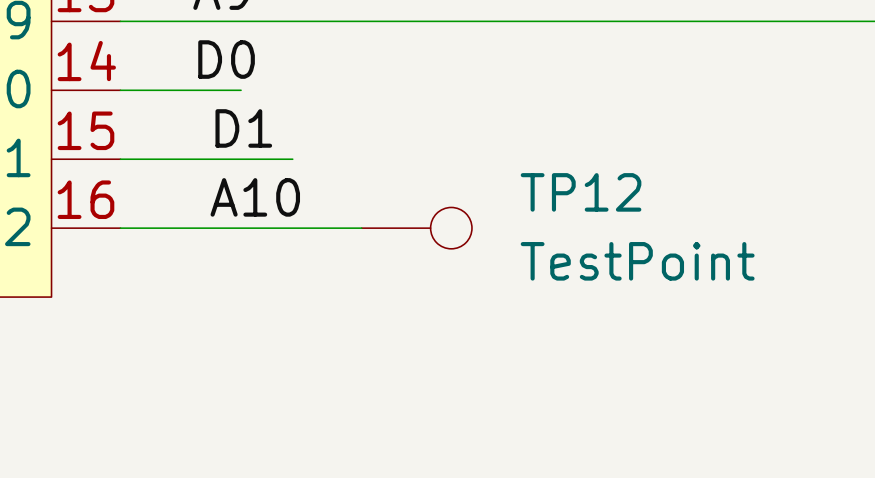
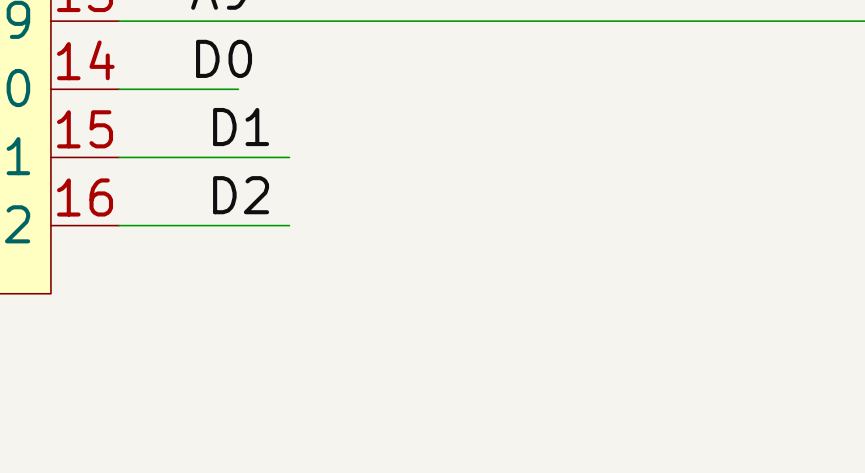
label: A10 (255, 197) -> D2 (241, 195)
wire: (292, 228) (361, 228) -> none
TP12: TestPoint (416, 228) -> none

